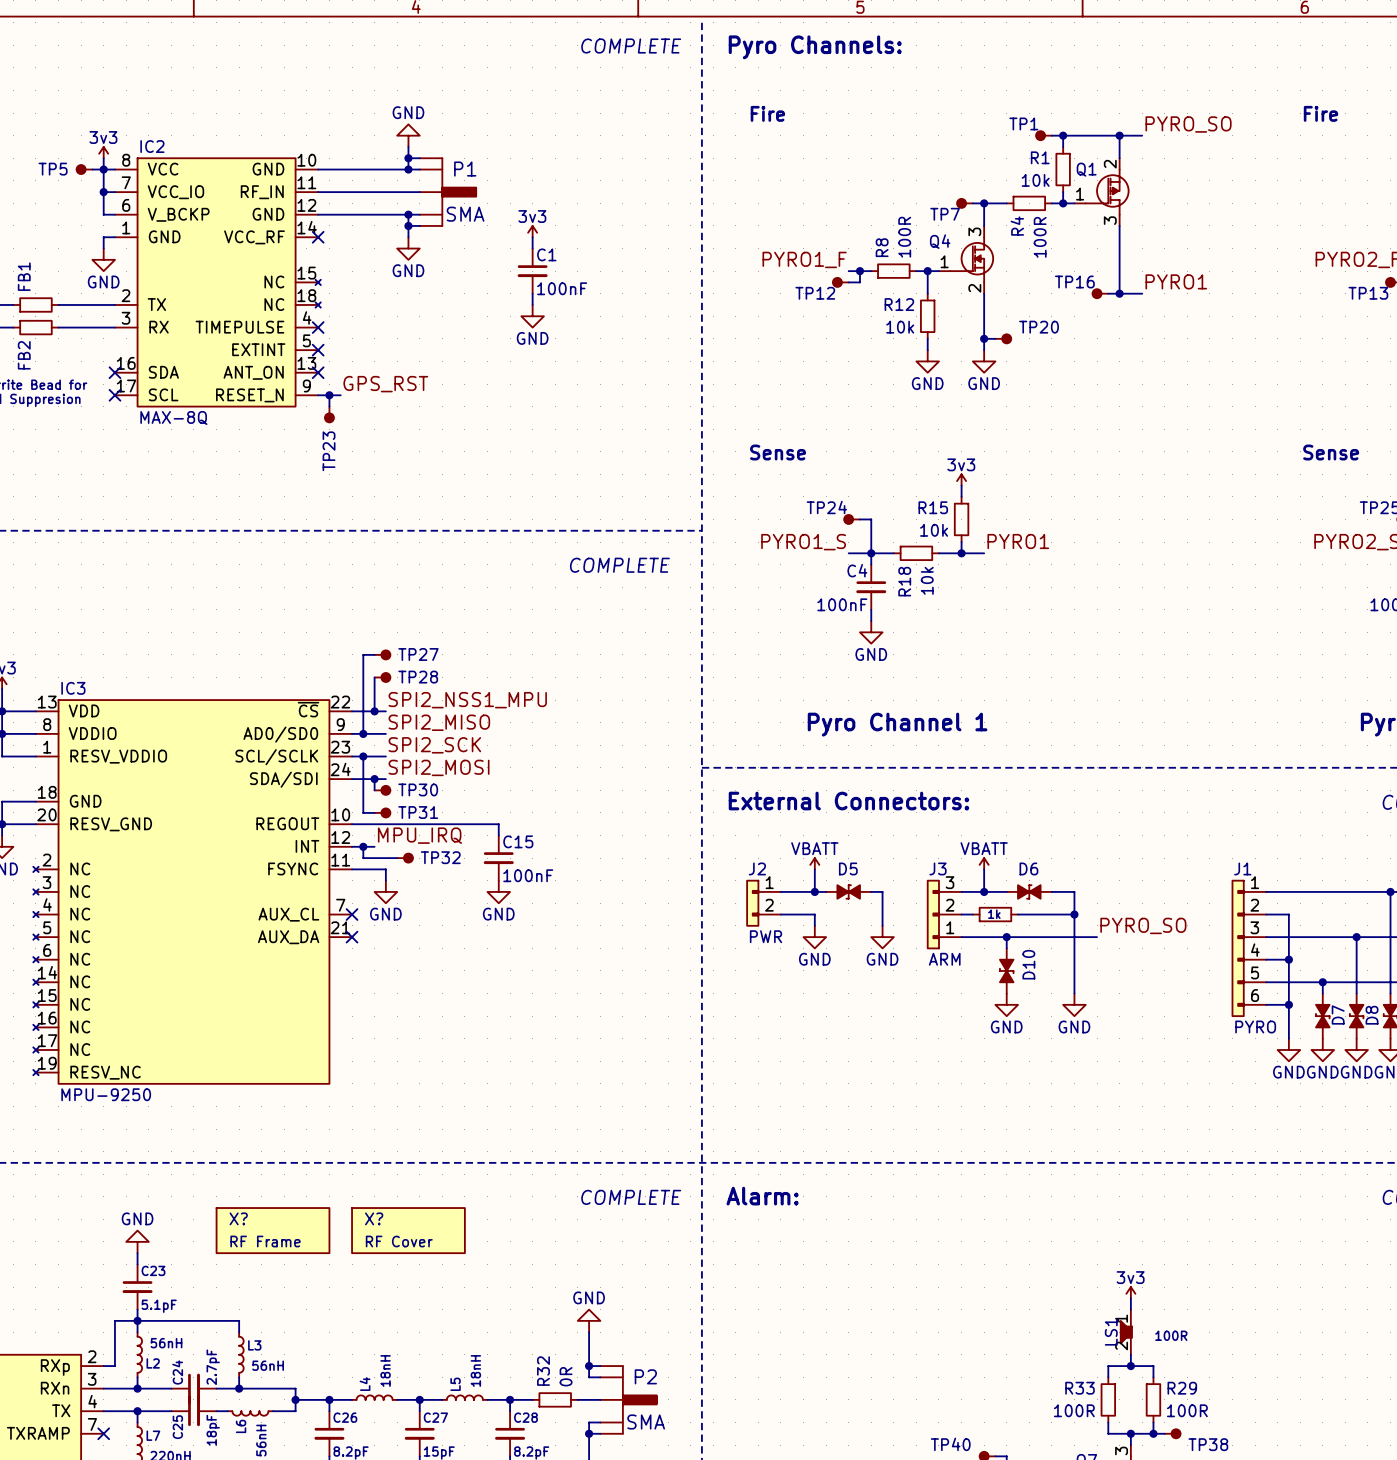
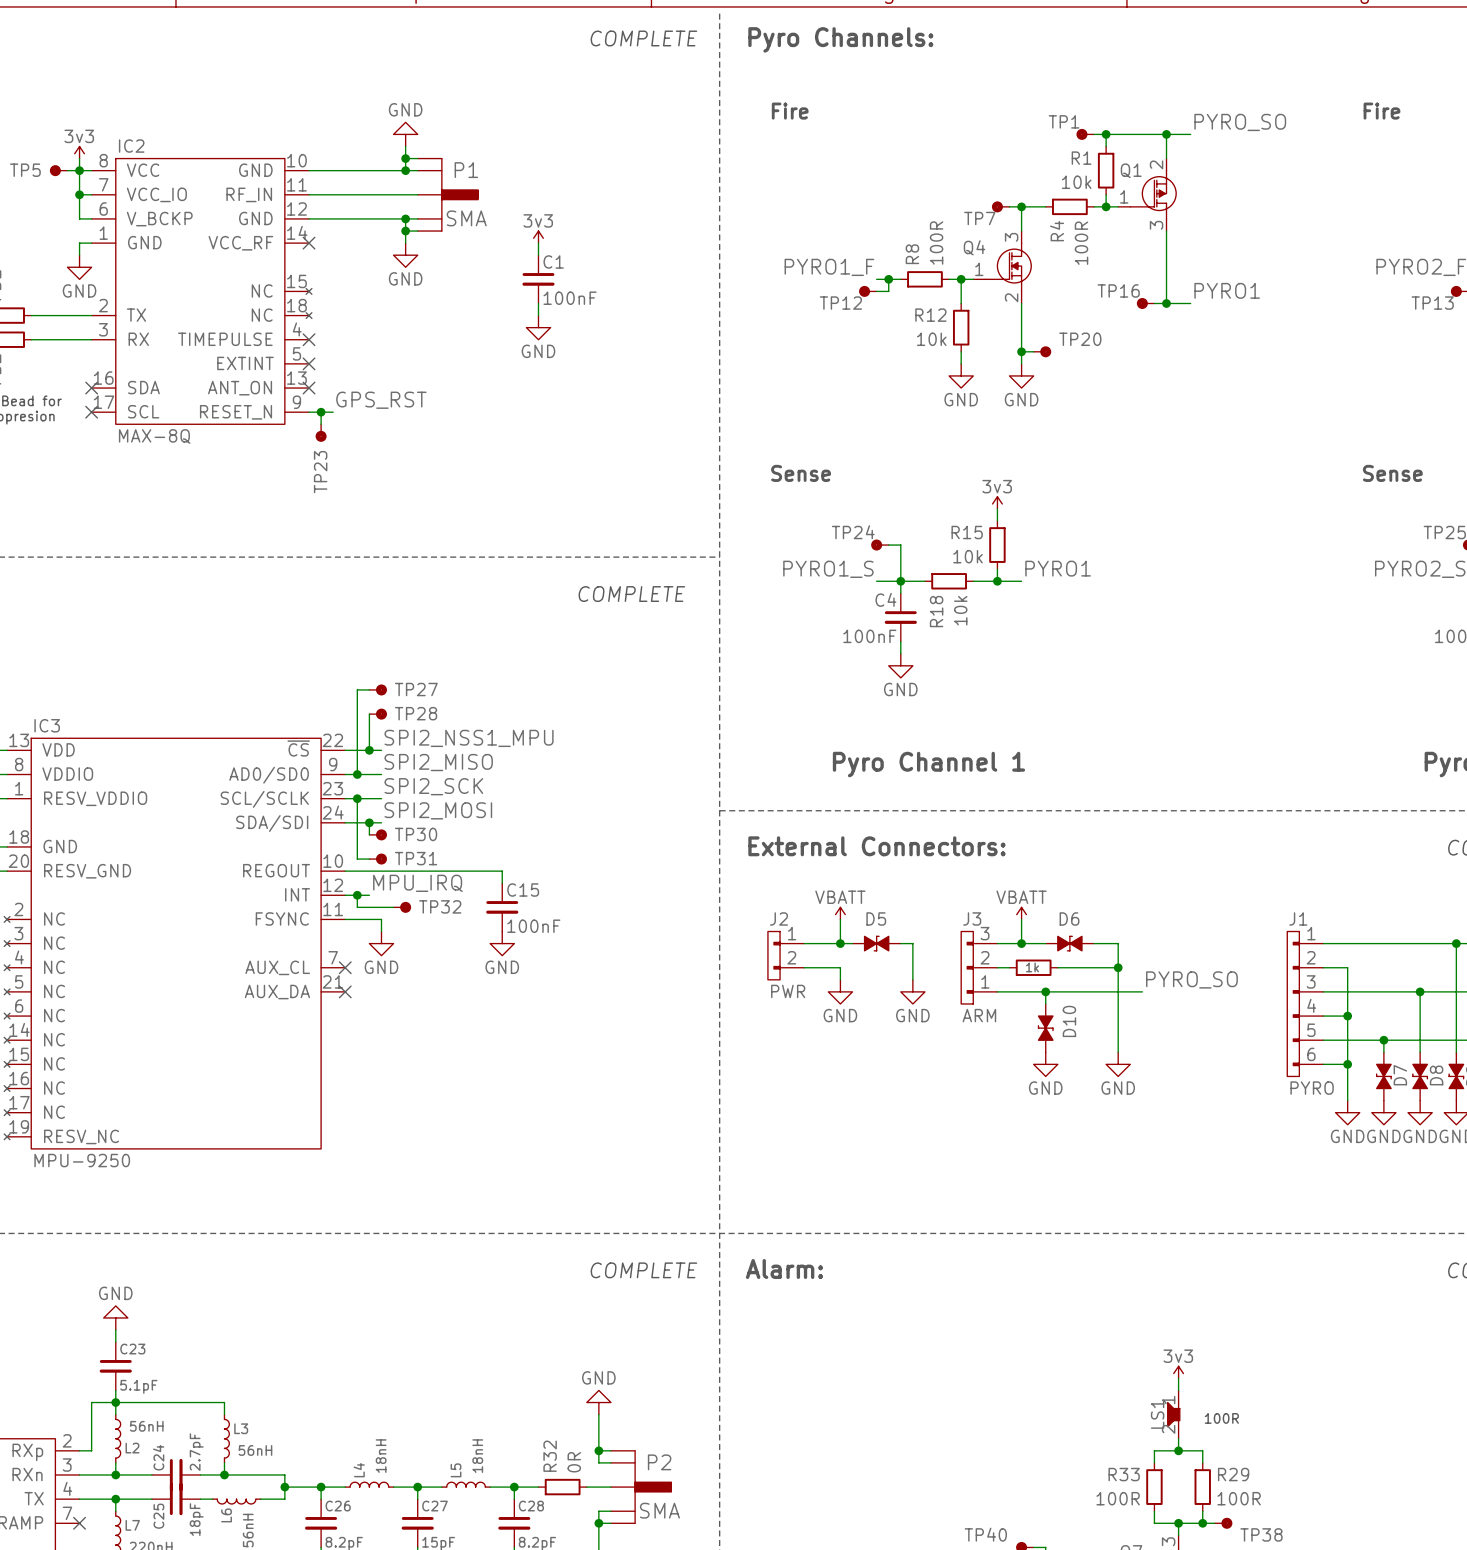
X?: RF Frame (273, 1230) -> none
X?: RF Cover (408, 1230) -> none

